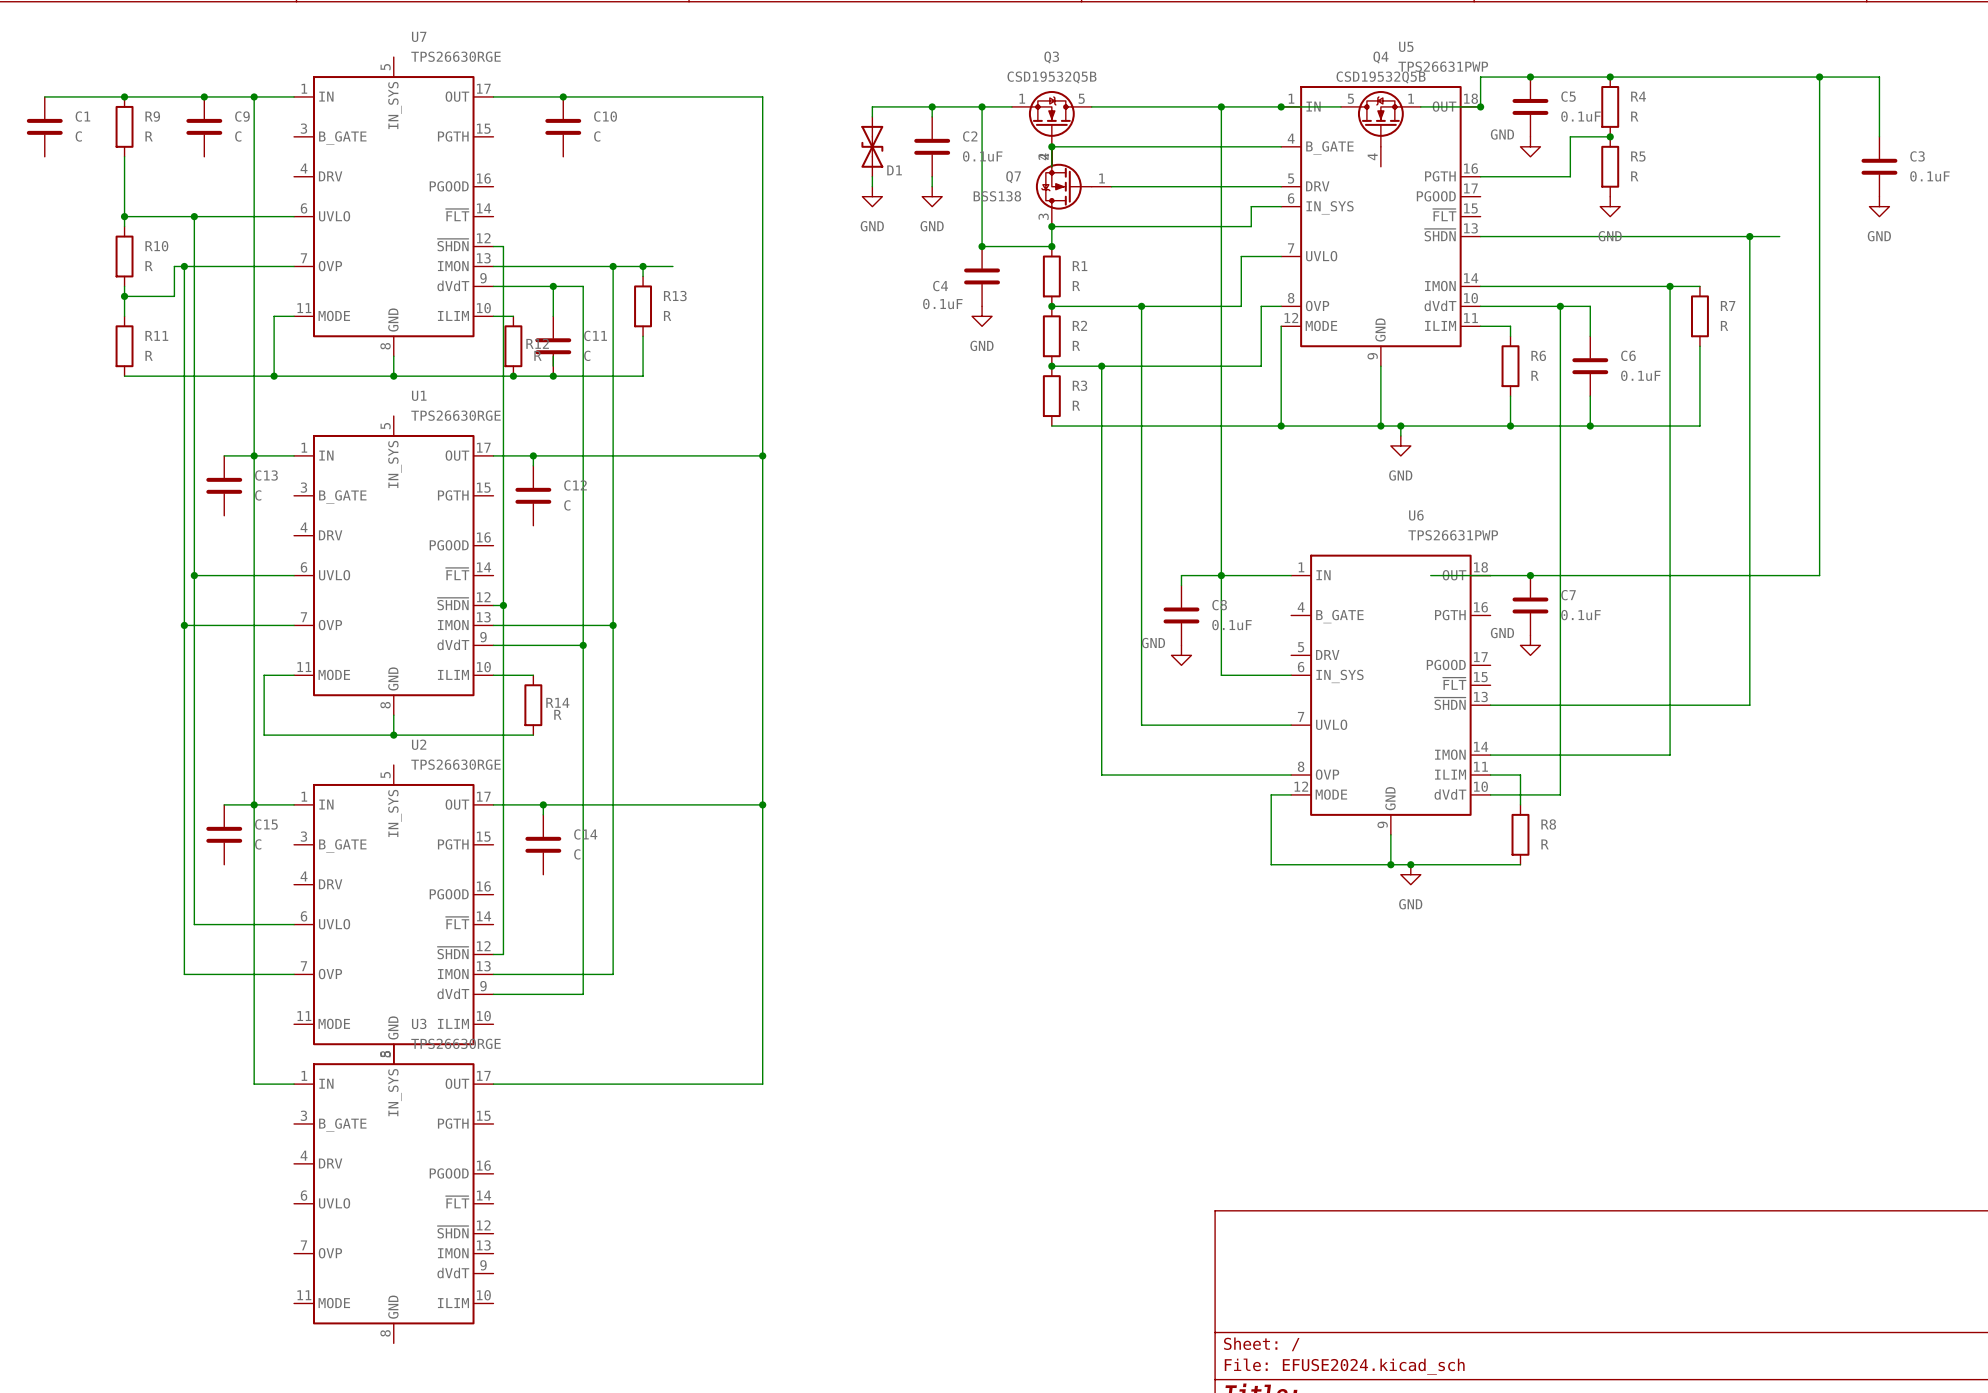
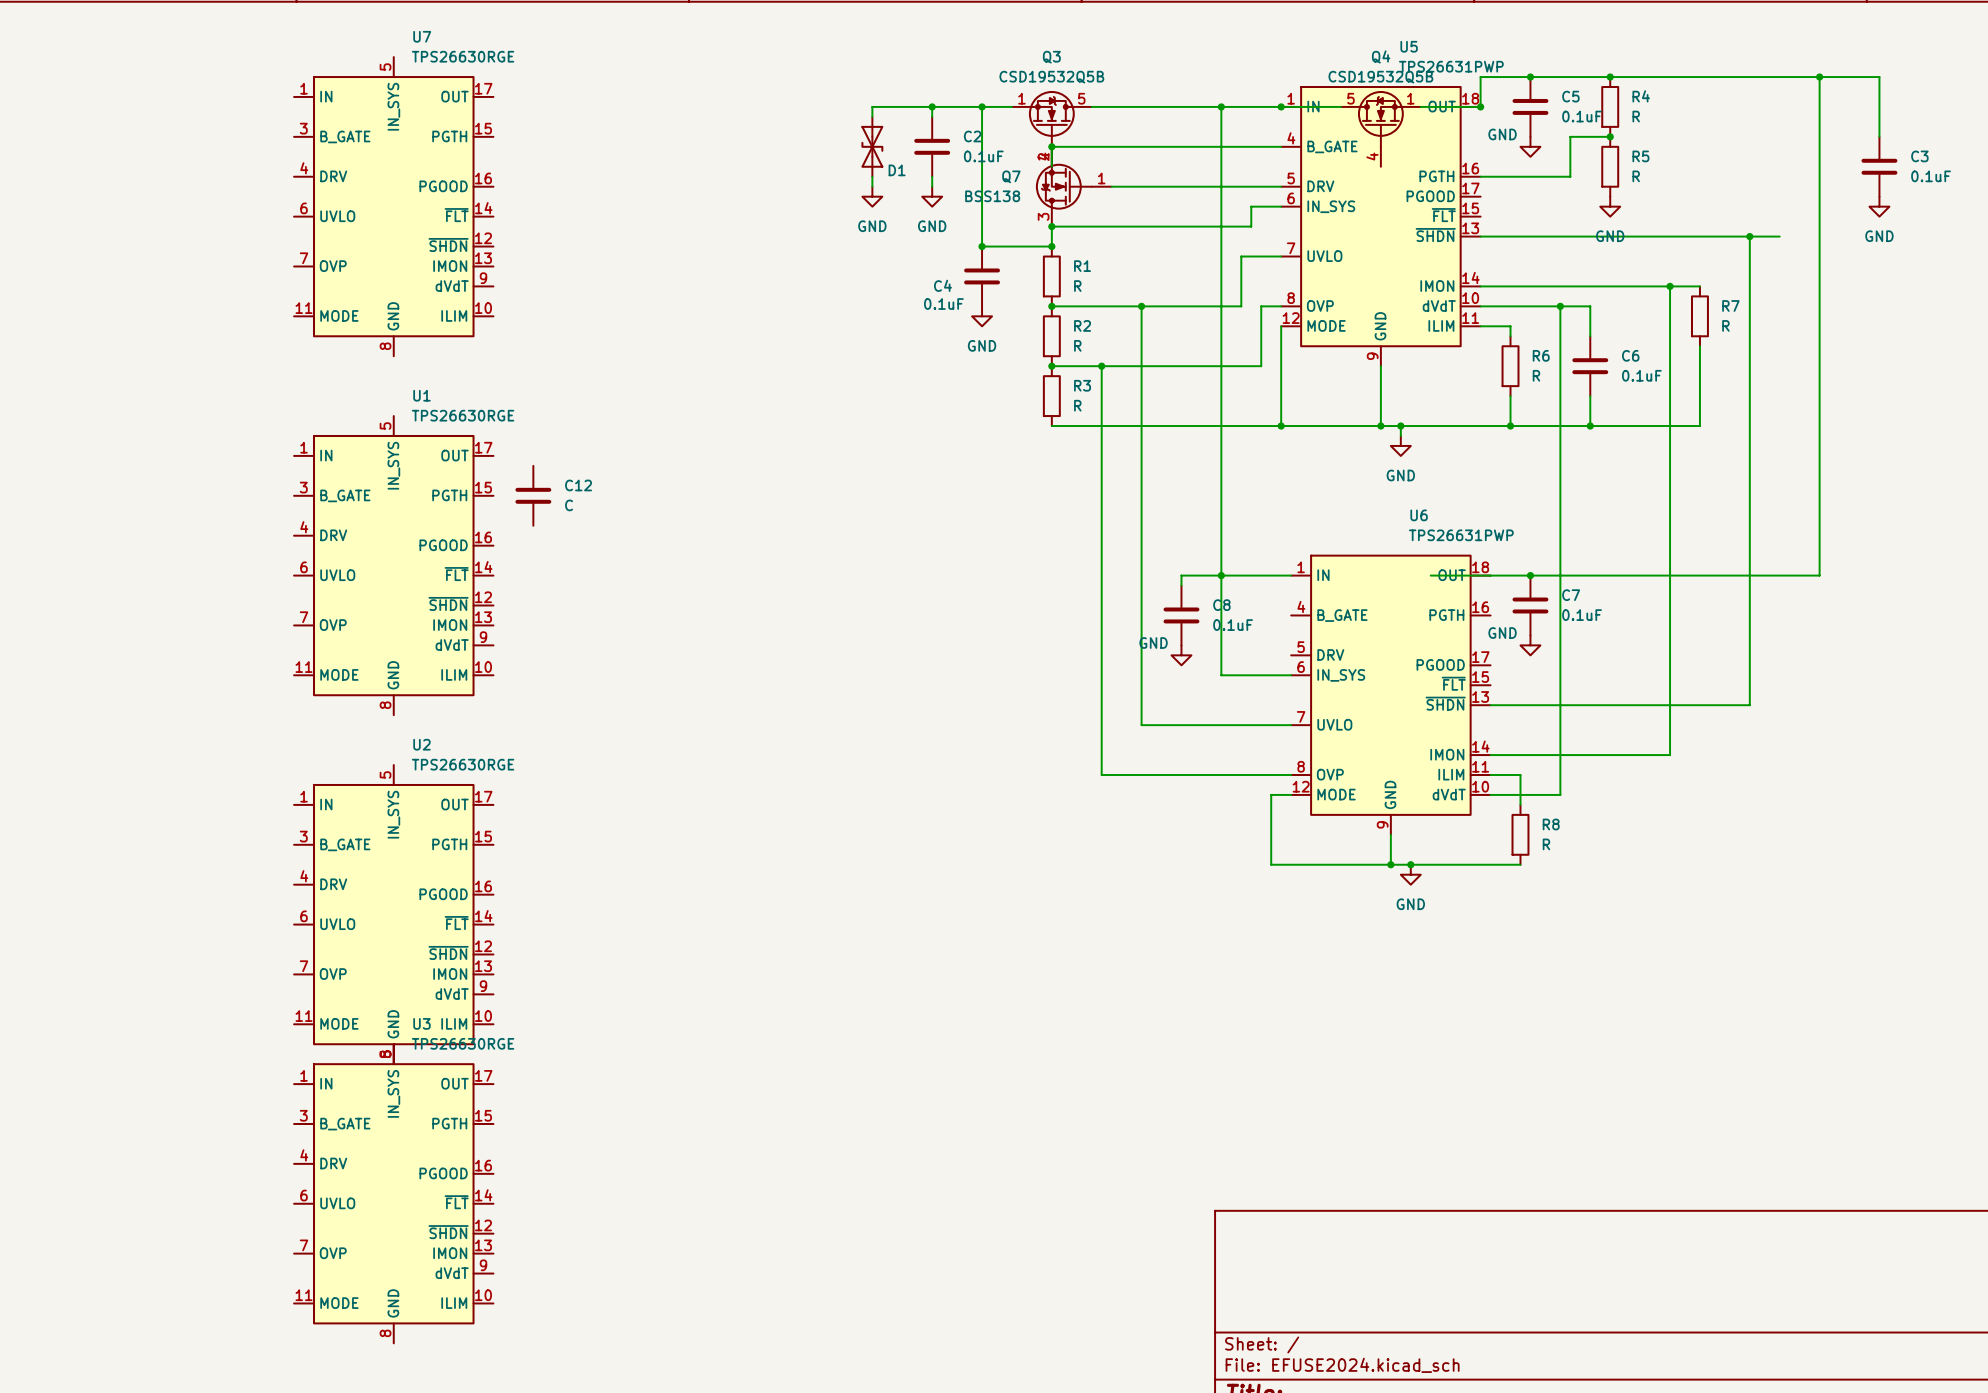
wire: (44, 96) (294, 96) -> none
junction: (124, 96) -> none
junction: (204, 96) -> none
wire: (254, 96) (254, 1084) (294, 1084) -> none
junction: (254, 96) -> none
wire: (493, 96) (762, 96) (762, 1084) (493, 1084) -> none
junction: (563, 96) -> none
C1: C (44, 126) -> none
R9: R (124, 126) -> none
C9: C (204, 126) -> none
C10: C (563, 126) -> none
wire: (124, 156) (124, 226) -> none
wire: (124, 216) (294, 216) -> none
junction: (124, 216) -> none
wire: (194, 216) (194, 924) (294, 924) -> none
junction: (194, 216) -> none
wire: (493, 246) (503, 246) (503, 954) (493, 954) -> none
R10: R (124, 256) -> none
wire: (184, 266) (184, 974) (294, 974) -> none
junction: (184, 266) -> none
wire: (294, 266) (174, 266) (174, 296) (124, 296) -> none
wire: (493, 266) (672, 266) -> none
wire: (613, 266) (613, 974) (493, 974) -> none
junction: (613, 266) -> none
wire: (643, 266) (643, 276) -> none
junction: (643, 266) -> none
wire: (124, 286) (124, 316) -> none
wire: (493, 286) (583, 286) (583, 994) (493, 994) -> none
wire: (553, 286) (553, 316) -> none
junction: (553, 286) -> none
junction: (124, 296) -> none
R13: R (643, 306) -> none
wire: (294, 316) (274, 316) (274, 376) -> none
wire: (493, 316) (513, 316) -> none
wire: (643, 336) (643, 376) (124, 376) -> none
R11: R (124, 346) -> none
R12: R (513, 346) -> none
C11: C (553, 346) -> none
wire: (393, 356) (393, 376) -> none
wire: (553, 356) (553, 366) -> none
junction: (274, 376) -> none
junction: (393, 376) -> none
junction: (513, 376) -> none
junction: (553, 376) -> none
wire: (224, 455) (294, 455) -> none
junction: (254, 455) -> none
wire: (493, 455) (762, 455) -> none
wire: (533, 455) (533, 465) -> none
junction: (533, 455) -> none
junction: (762, 455) -> none
C13: C (224, 485) -> none
wire: (194, 575) (294, 575) -> none
junction: (194, 575) -> none
wire: (493, 605) (503, 605) -> none
junction: (503, 605) -> none
wire: (184, 625) (294, 625) -> none
junction: (184, 625) -> none
wire: (493, 625) (613, 625) -> none
junction: (613, 625) -> none
wire: (493, 645) (583, 645) -> none
junction: (583, 645) -> none
wire: (294, 675) (264, 675) (264, 735) (533, 735) -> none
wire: (493, 675) (533, 675) -> none
R14: R (533, 705) -> none
wire: (393, 715) (393, 735) -> none
junction: (393, 735) -> none
wire: (224, 804) (294, 804) -> none
junction: (254, 804) -> none
wire: (493, 804) (762, 804) -> none
wire: (543, 804) (543, 814) -> none
junction: (543, 804) -> none
junction: (762, 804) -> none
C15: C (224, 834) -> none
C14: C (543, 844) -> none

